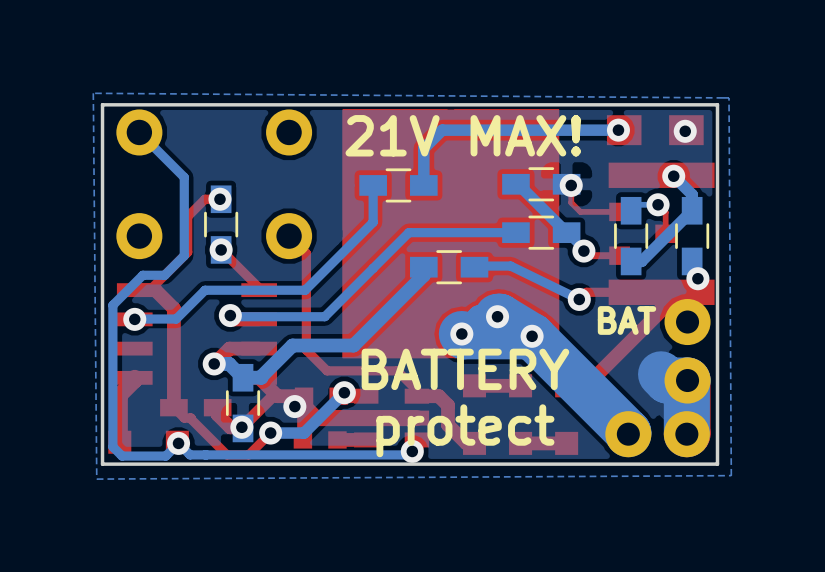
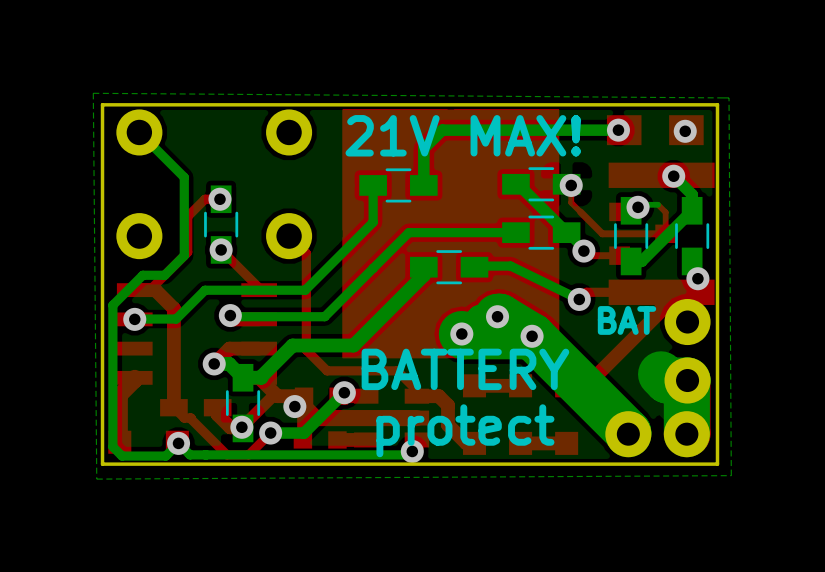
via position: (658, 204) -> (638, 207)
top track: (619, 211) (580, 211) -> (665, 233) (602, 233) (580, 211)

